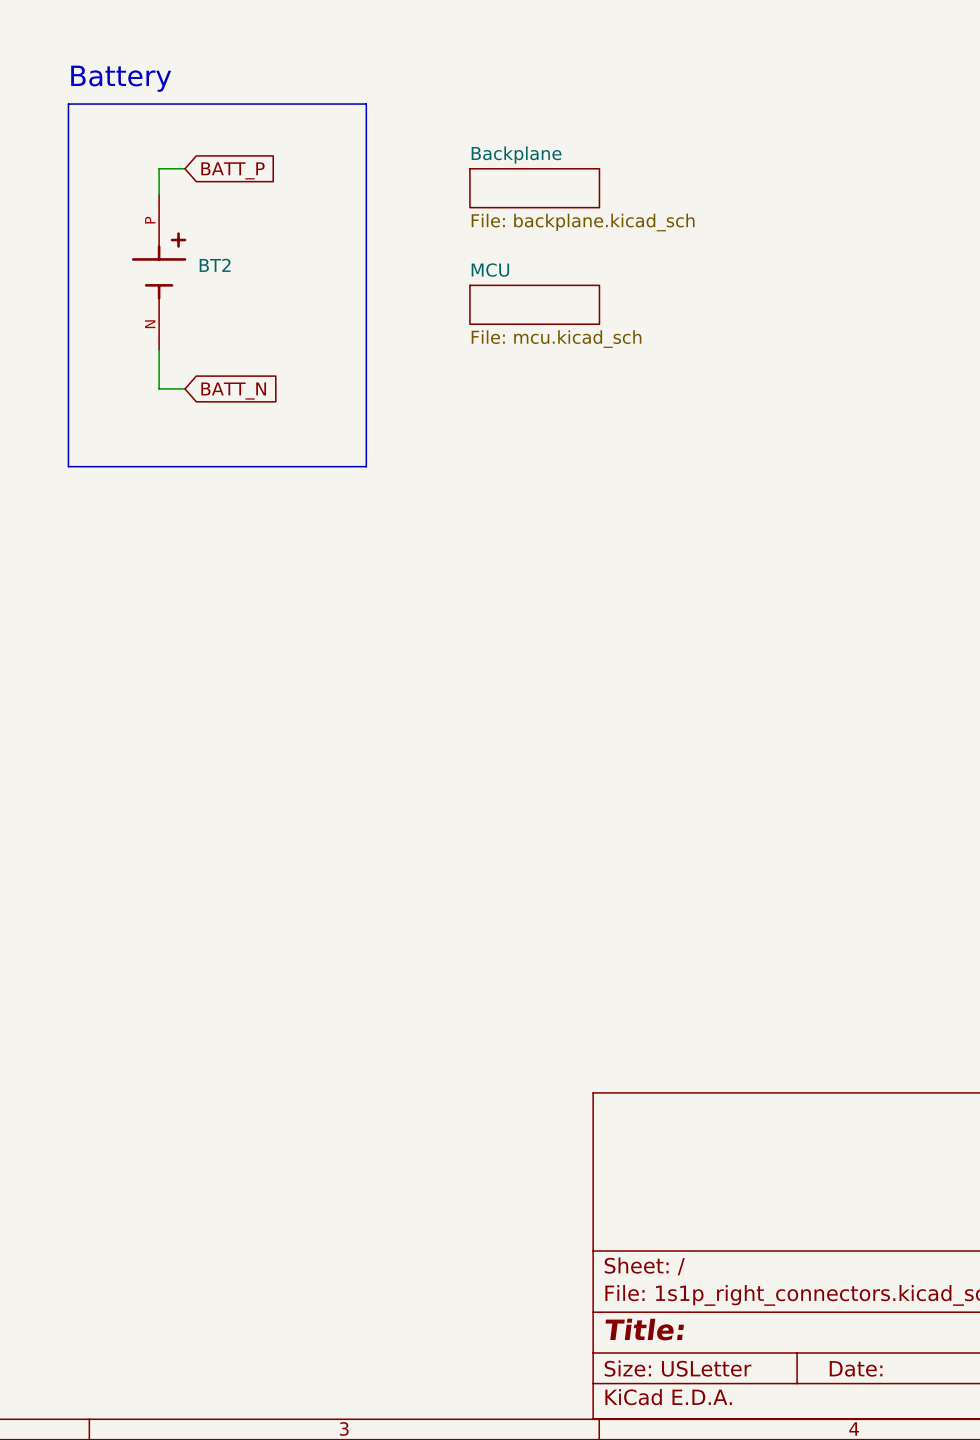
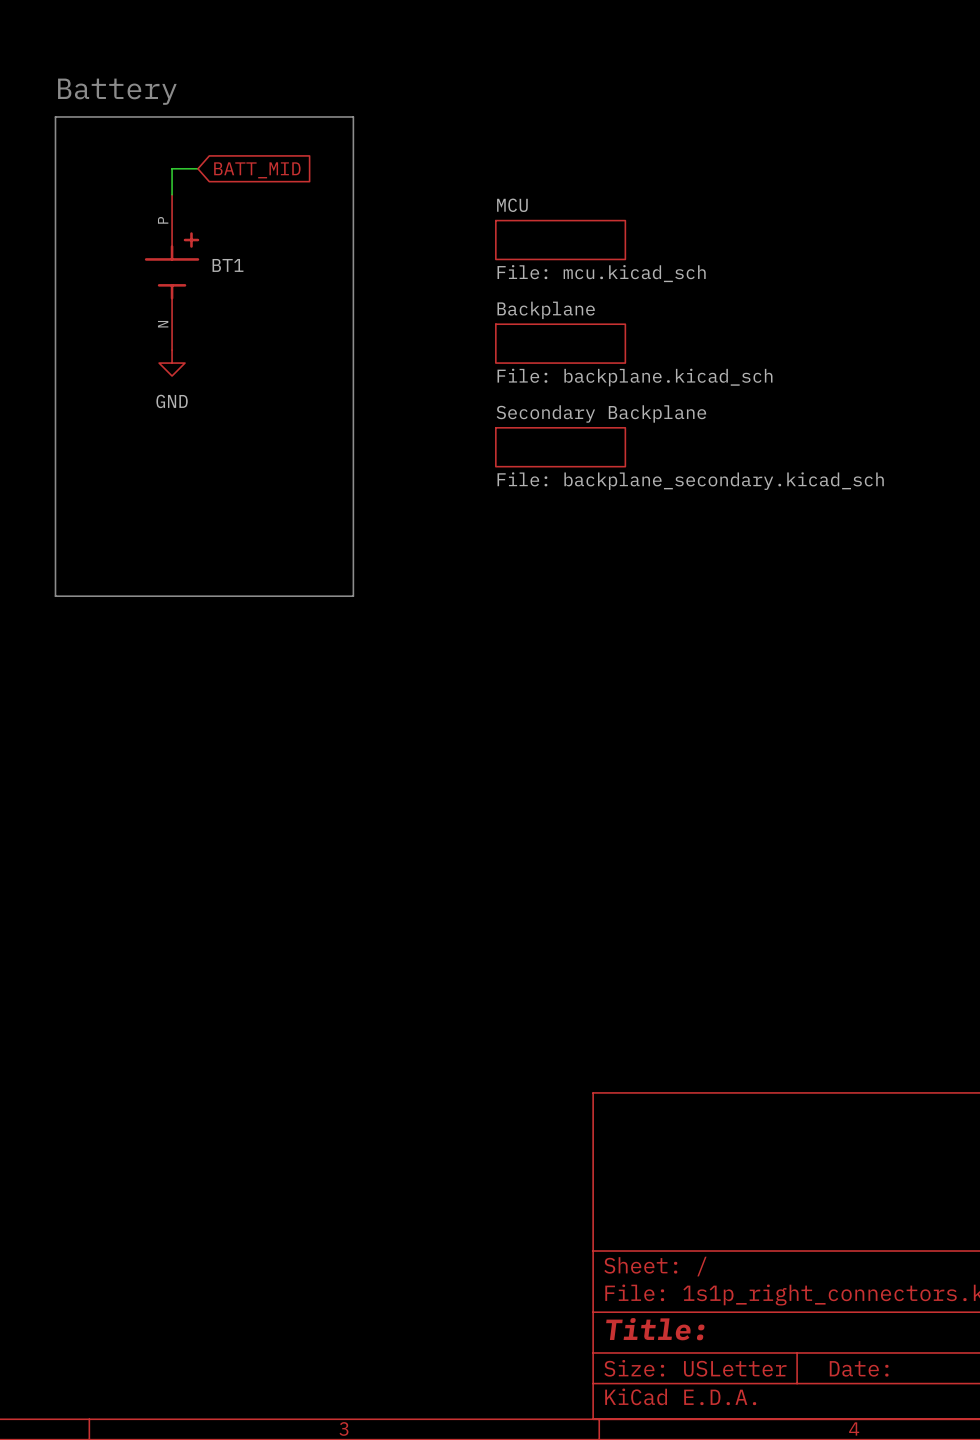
text position: Battery (121, 78) -> Battery (117, 91)
line: (68, 104) (366, 104) (366, 466) (68, 466) (68, 104) -> (55, 116) (55, 596) (353, 596) (353, 116) (55, 116)
wire: (172, 168) (159, 168) (159, 194) -> (172, 168) (172, 194)
wire: none -> (185, 168) (197, 168)
global label: BATT_P (232, 170) -> BATT_MID (257, 170)
sheet Backplane position: (534, 188) -> (560, 343)
BT2: (159, 272) -> none
BT1: none -> (172, 272)
sheet MCU position: (534, 304) -> (560, 240)
wire: (159, 350) (159, 388) (185, 388) -> none
power symbol: none -> GND (172, 363)
global label: BATT_N (233, 391) -> none
sheet Secondary Backplane: none -> File: backplane_secondary.kicad_sch (560, 447)

